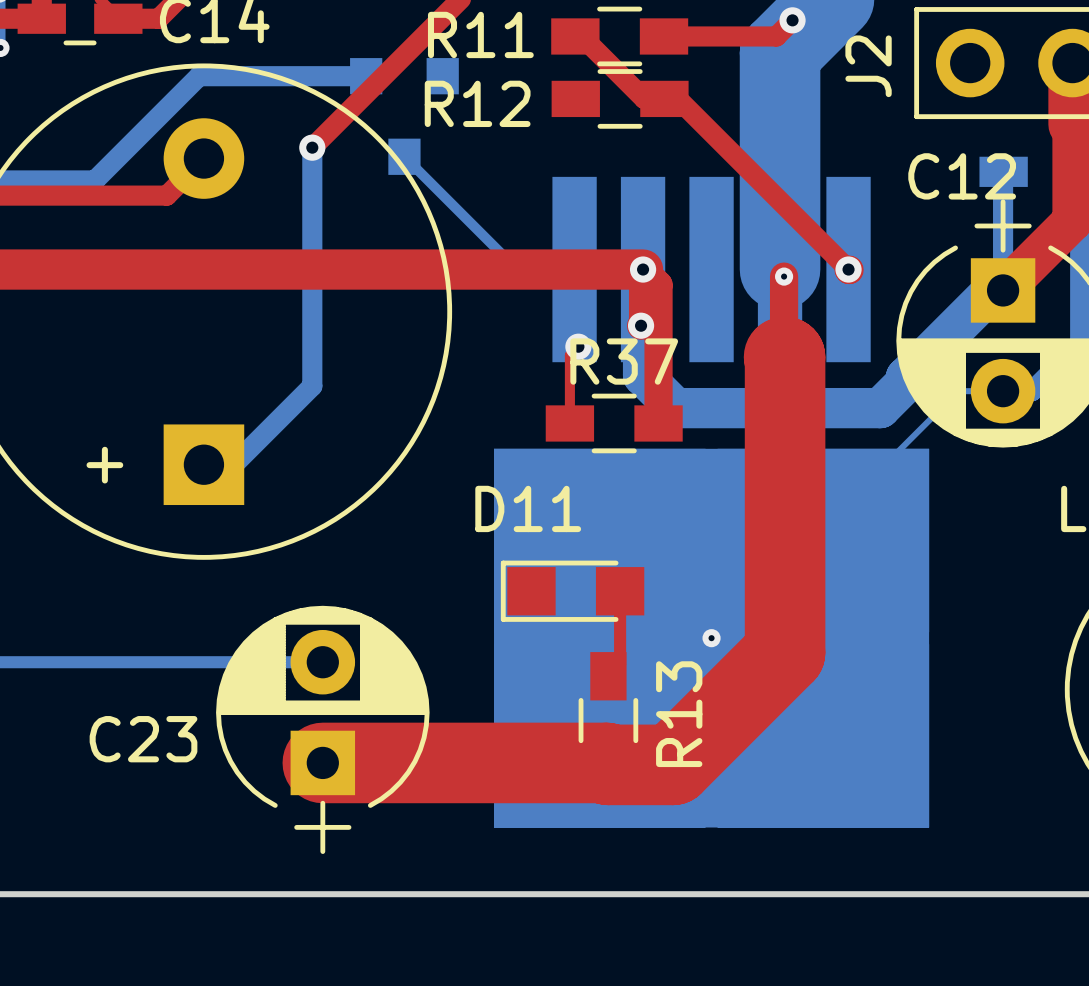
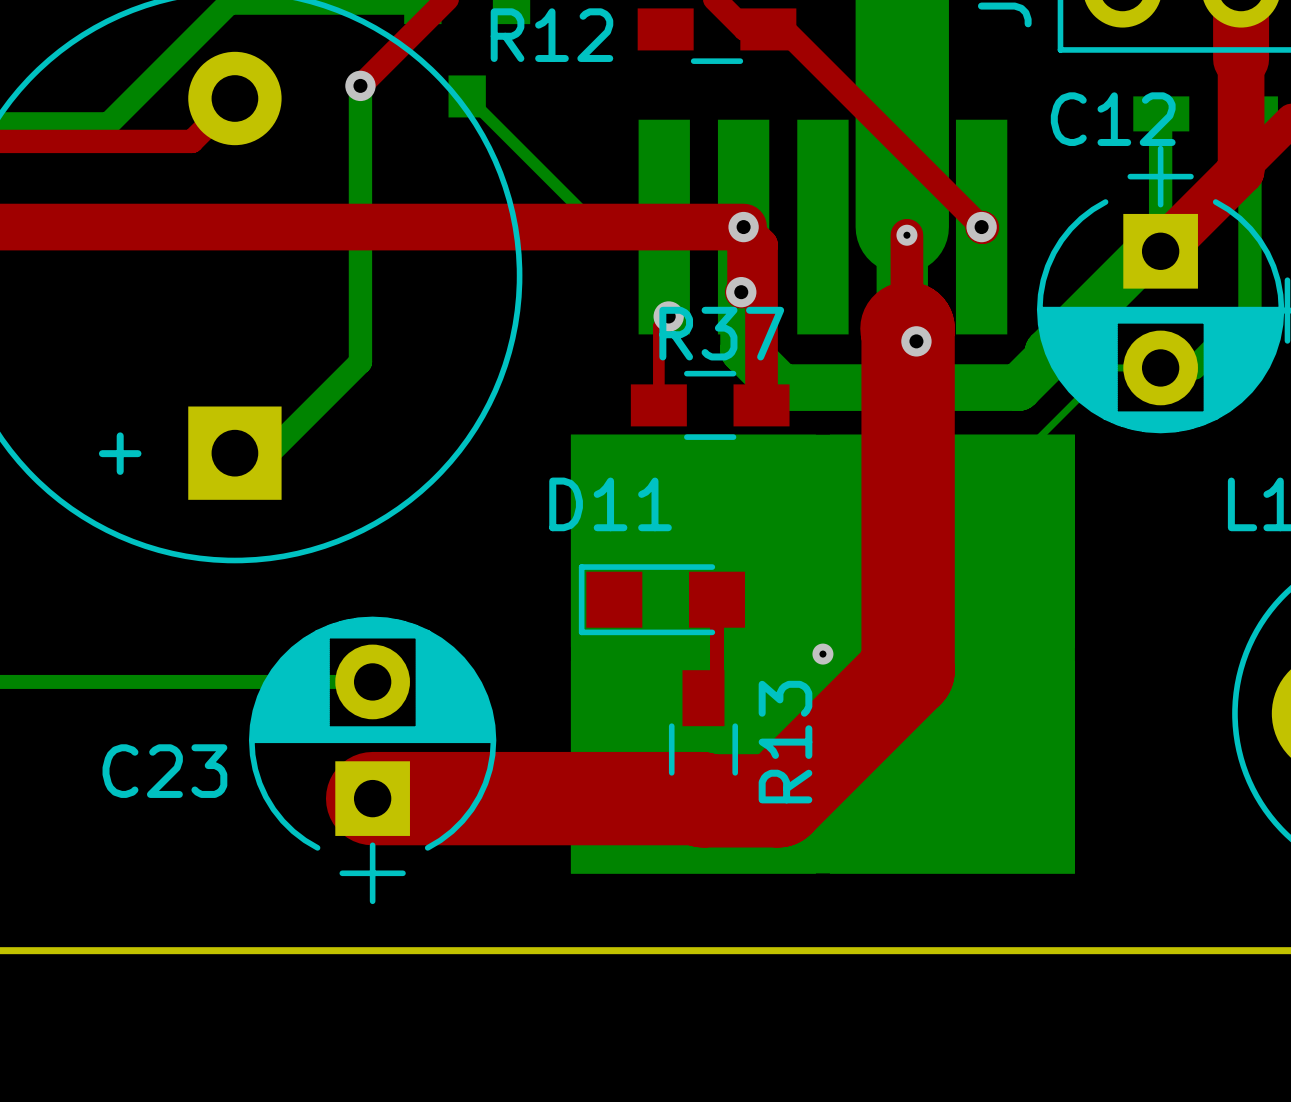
via: none -> (916, 341)

